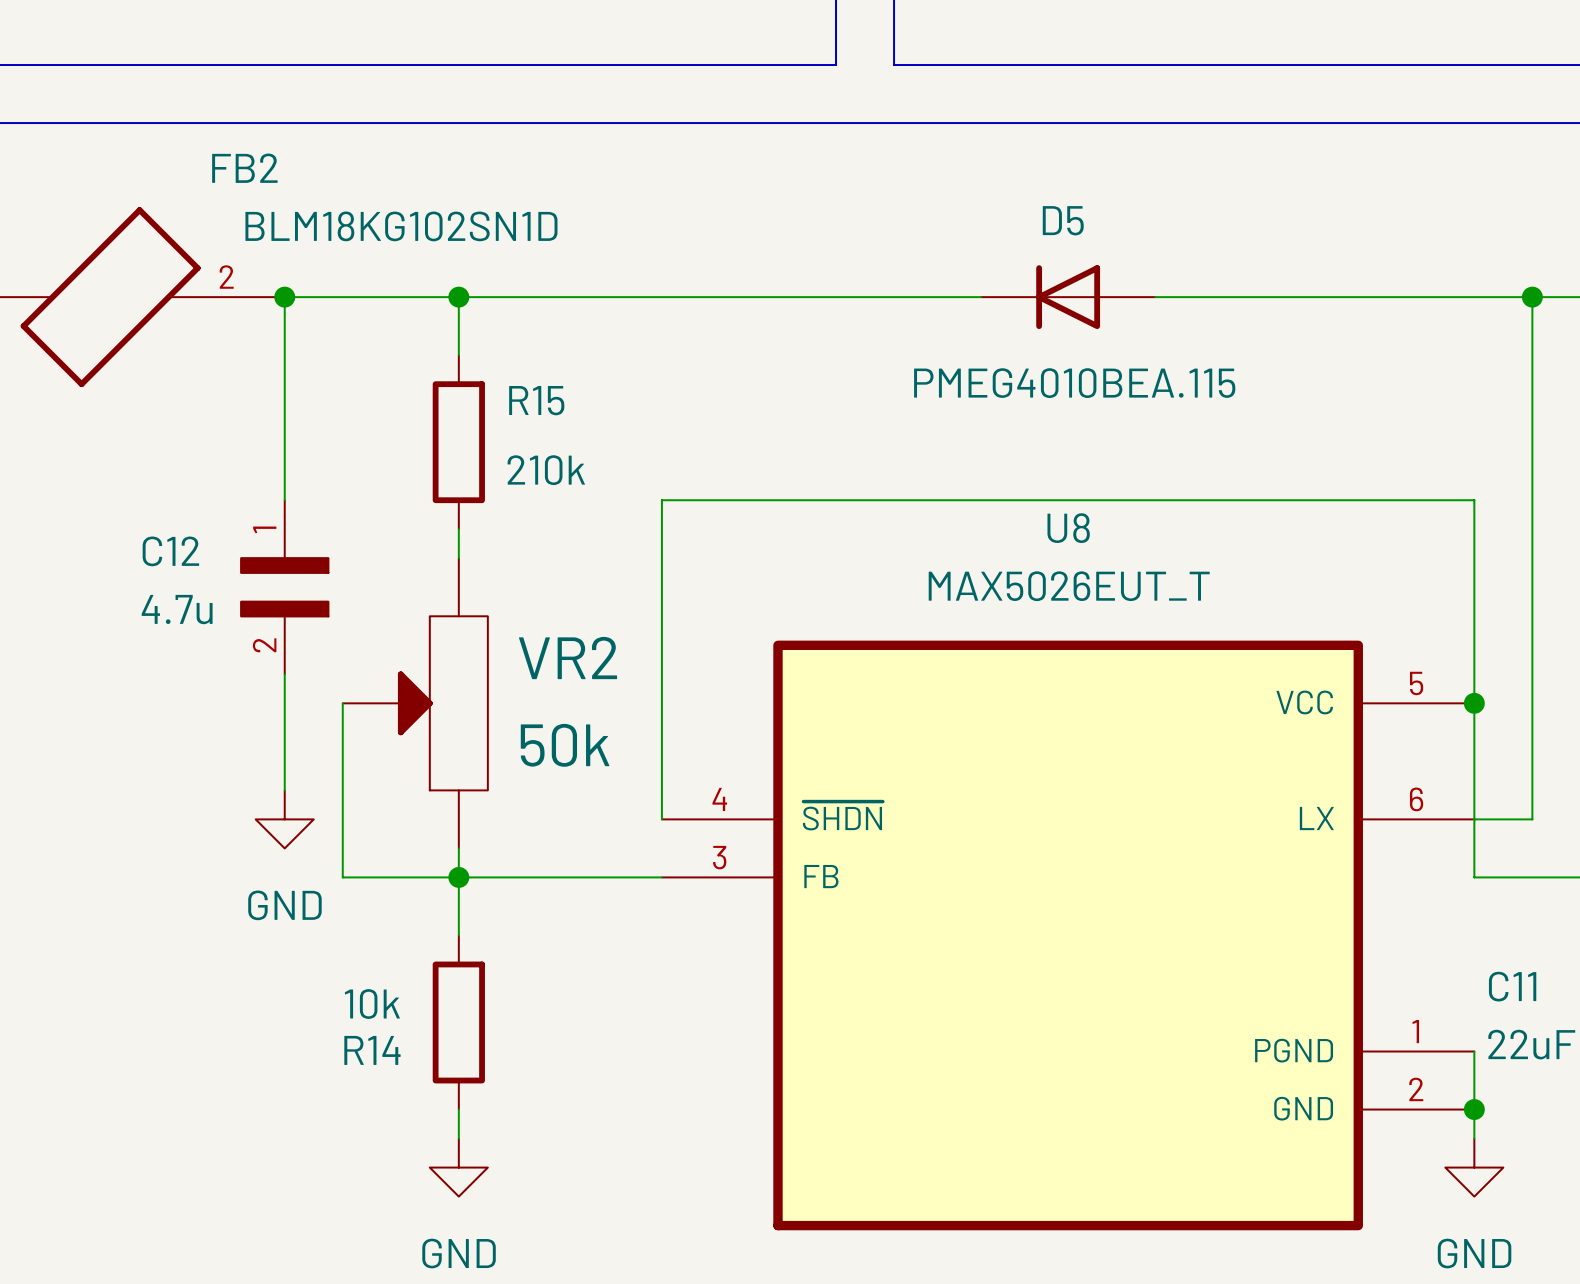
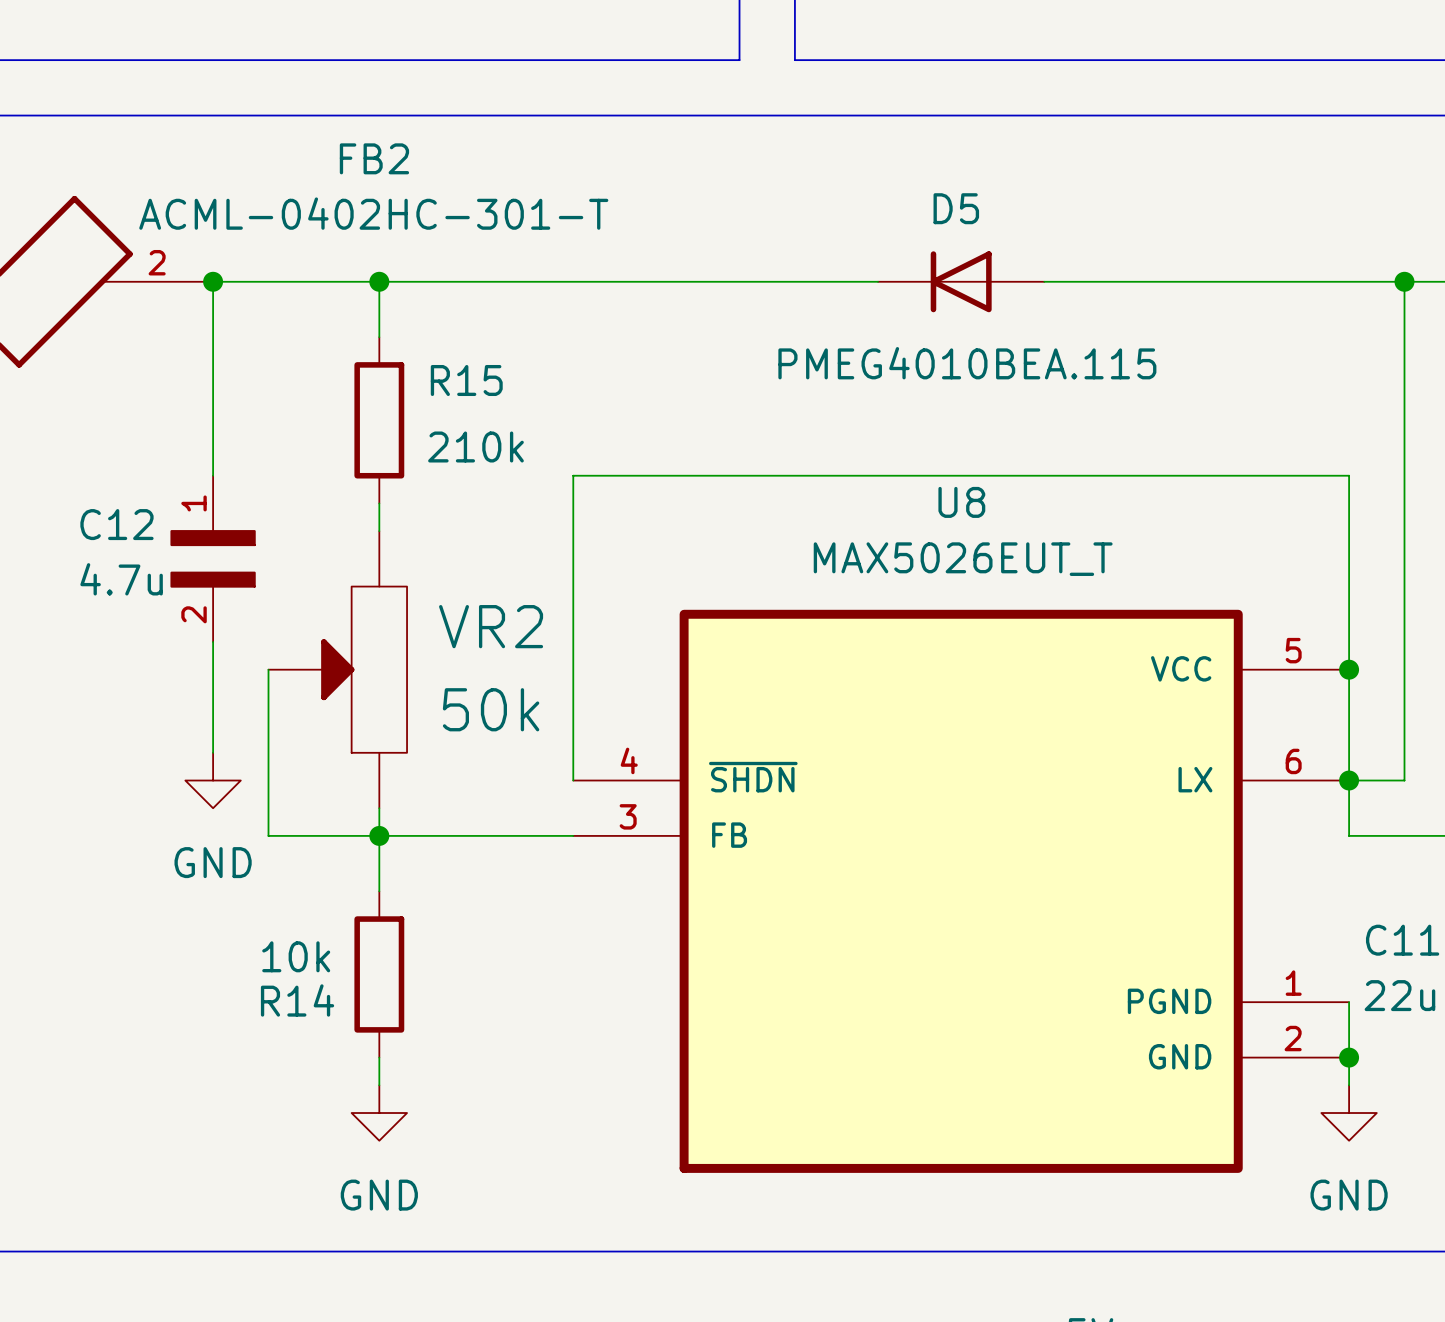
FB2 name position: FB2 (244, 168) -> FB2 (374, 158)
FB2 value: BLM18KG102SN1D (401, 226) -> ACML-0402HC-301-T (373, 213)
junction: none -> (1349, 780)

